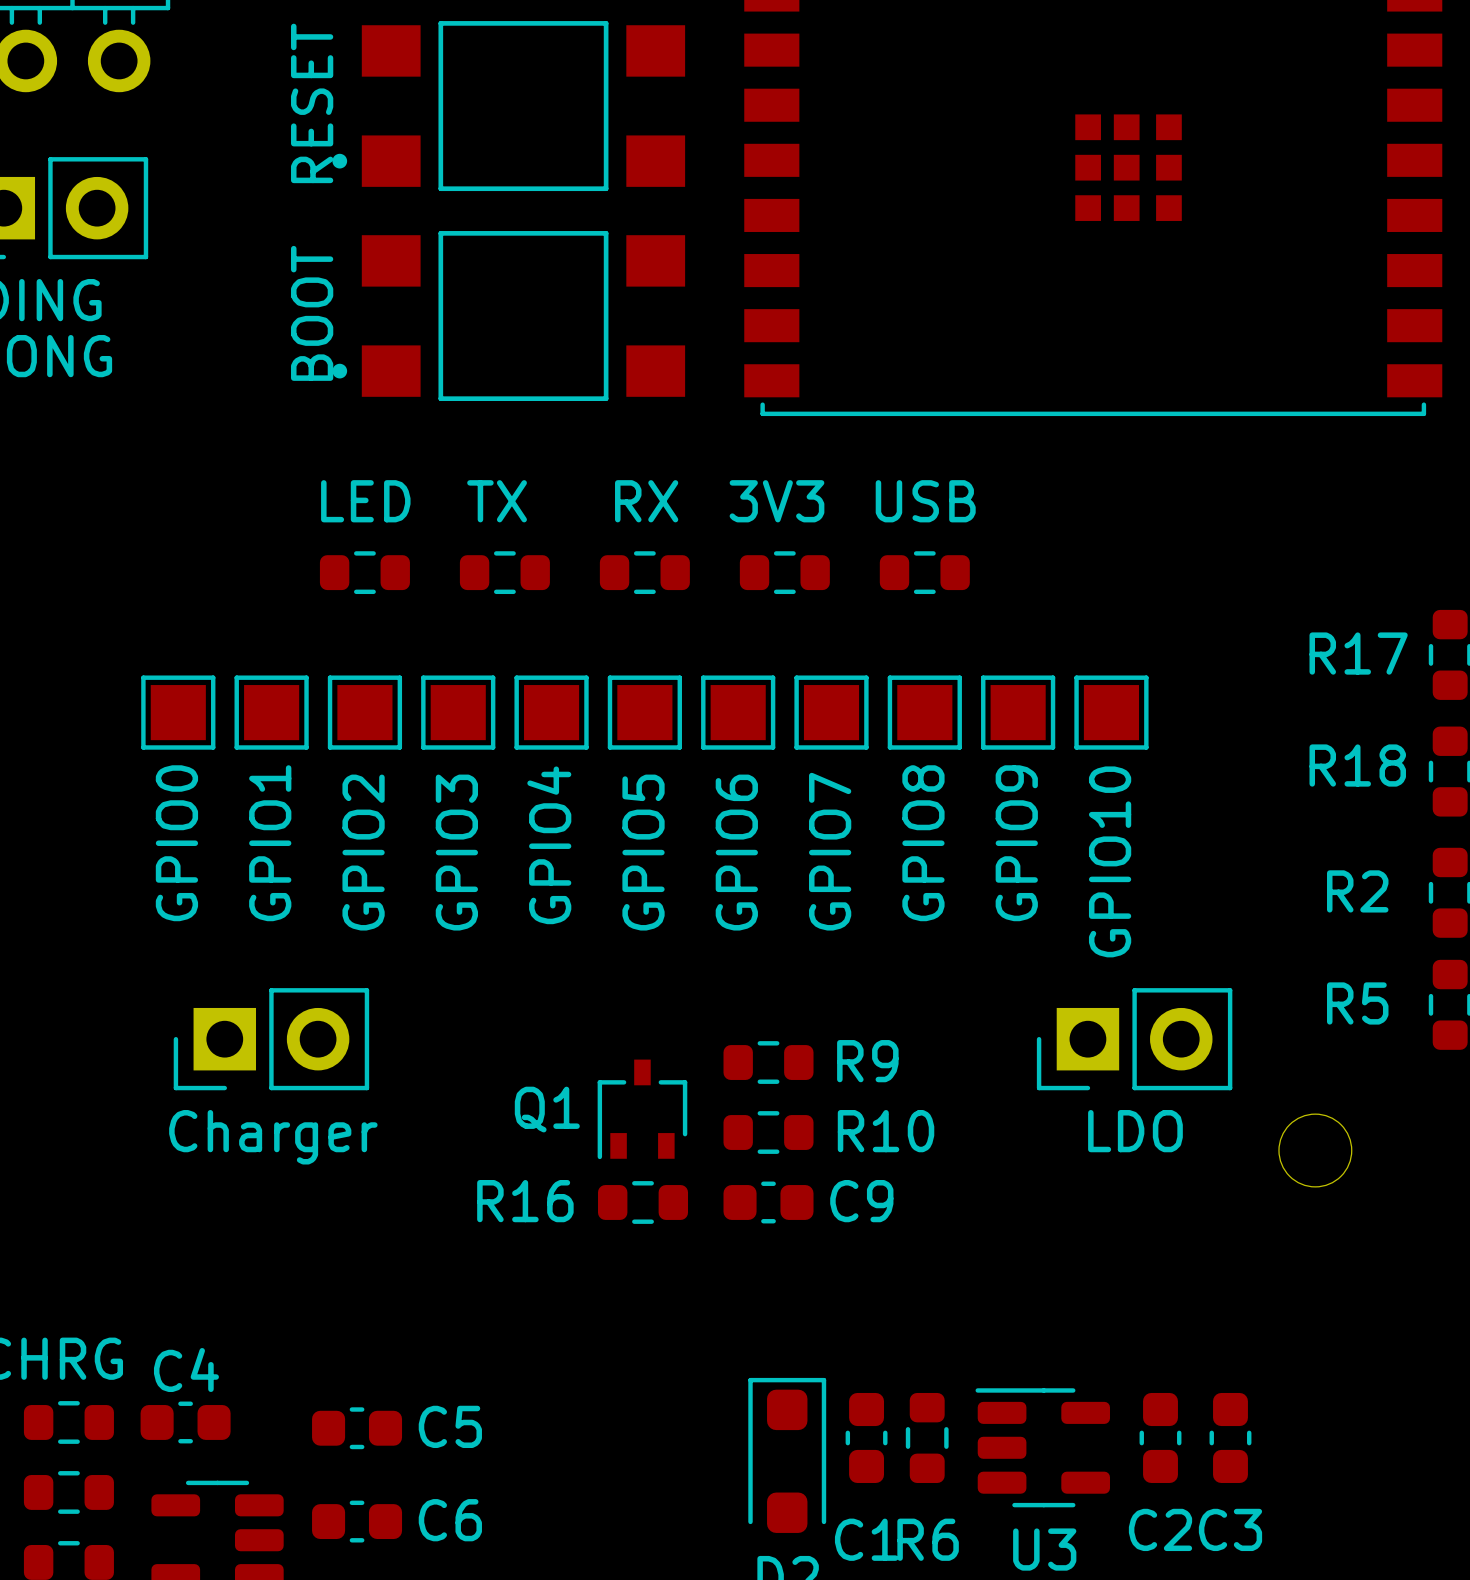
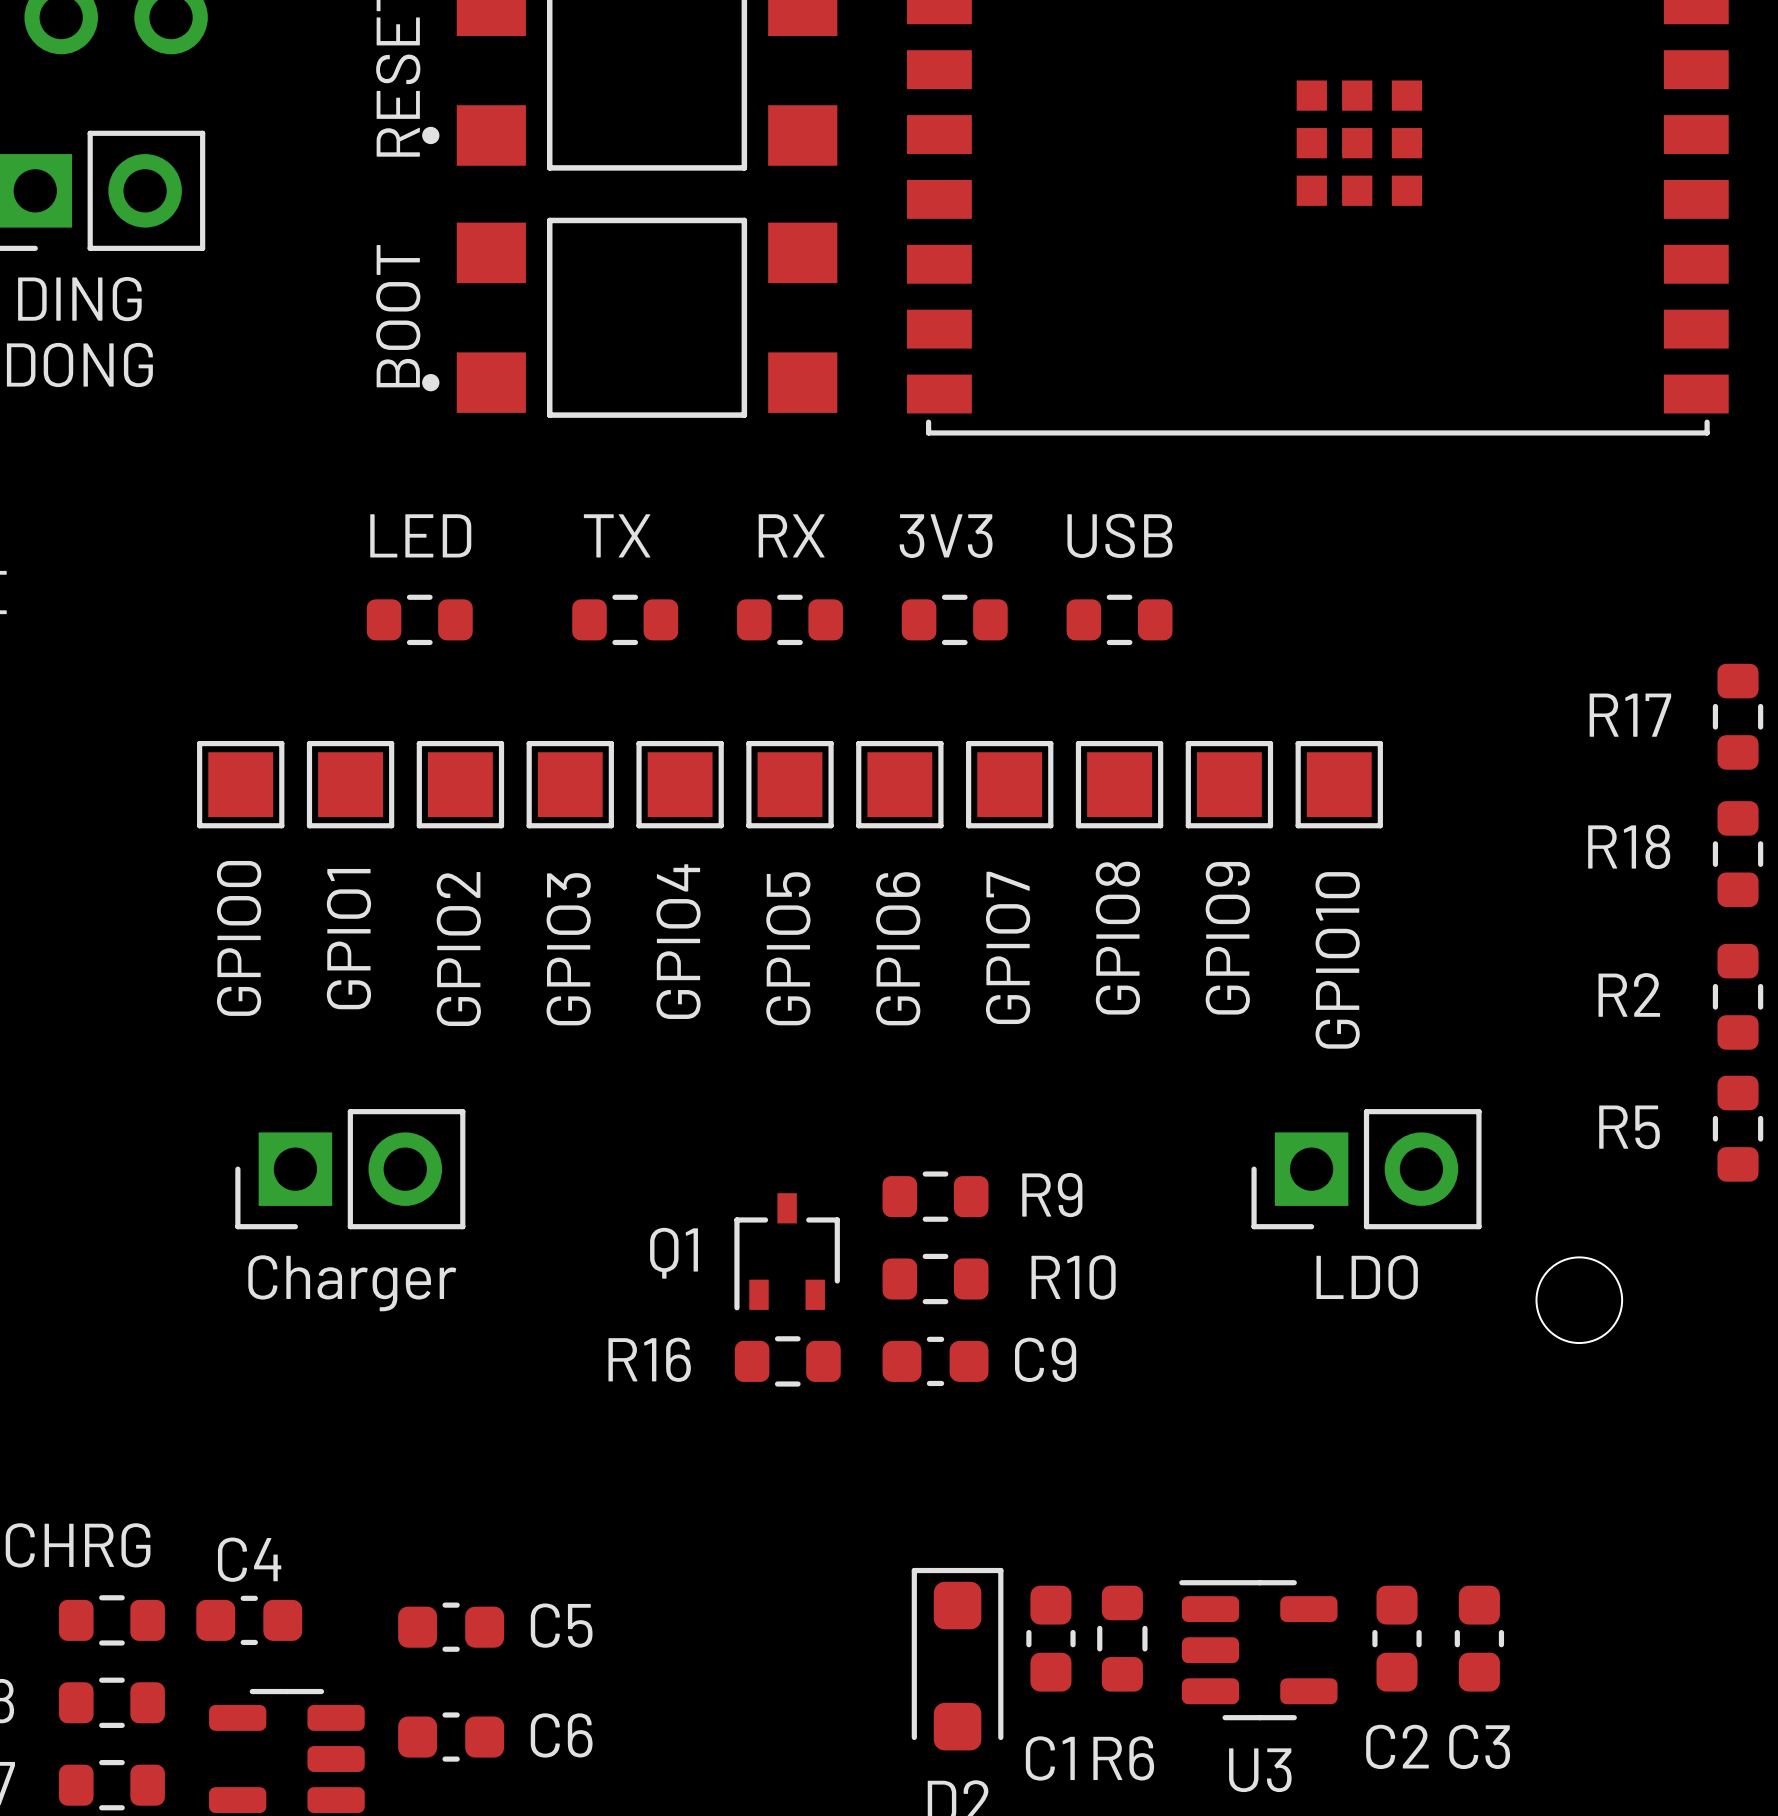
part position: (364, 572) -> (419, 619)

